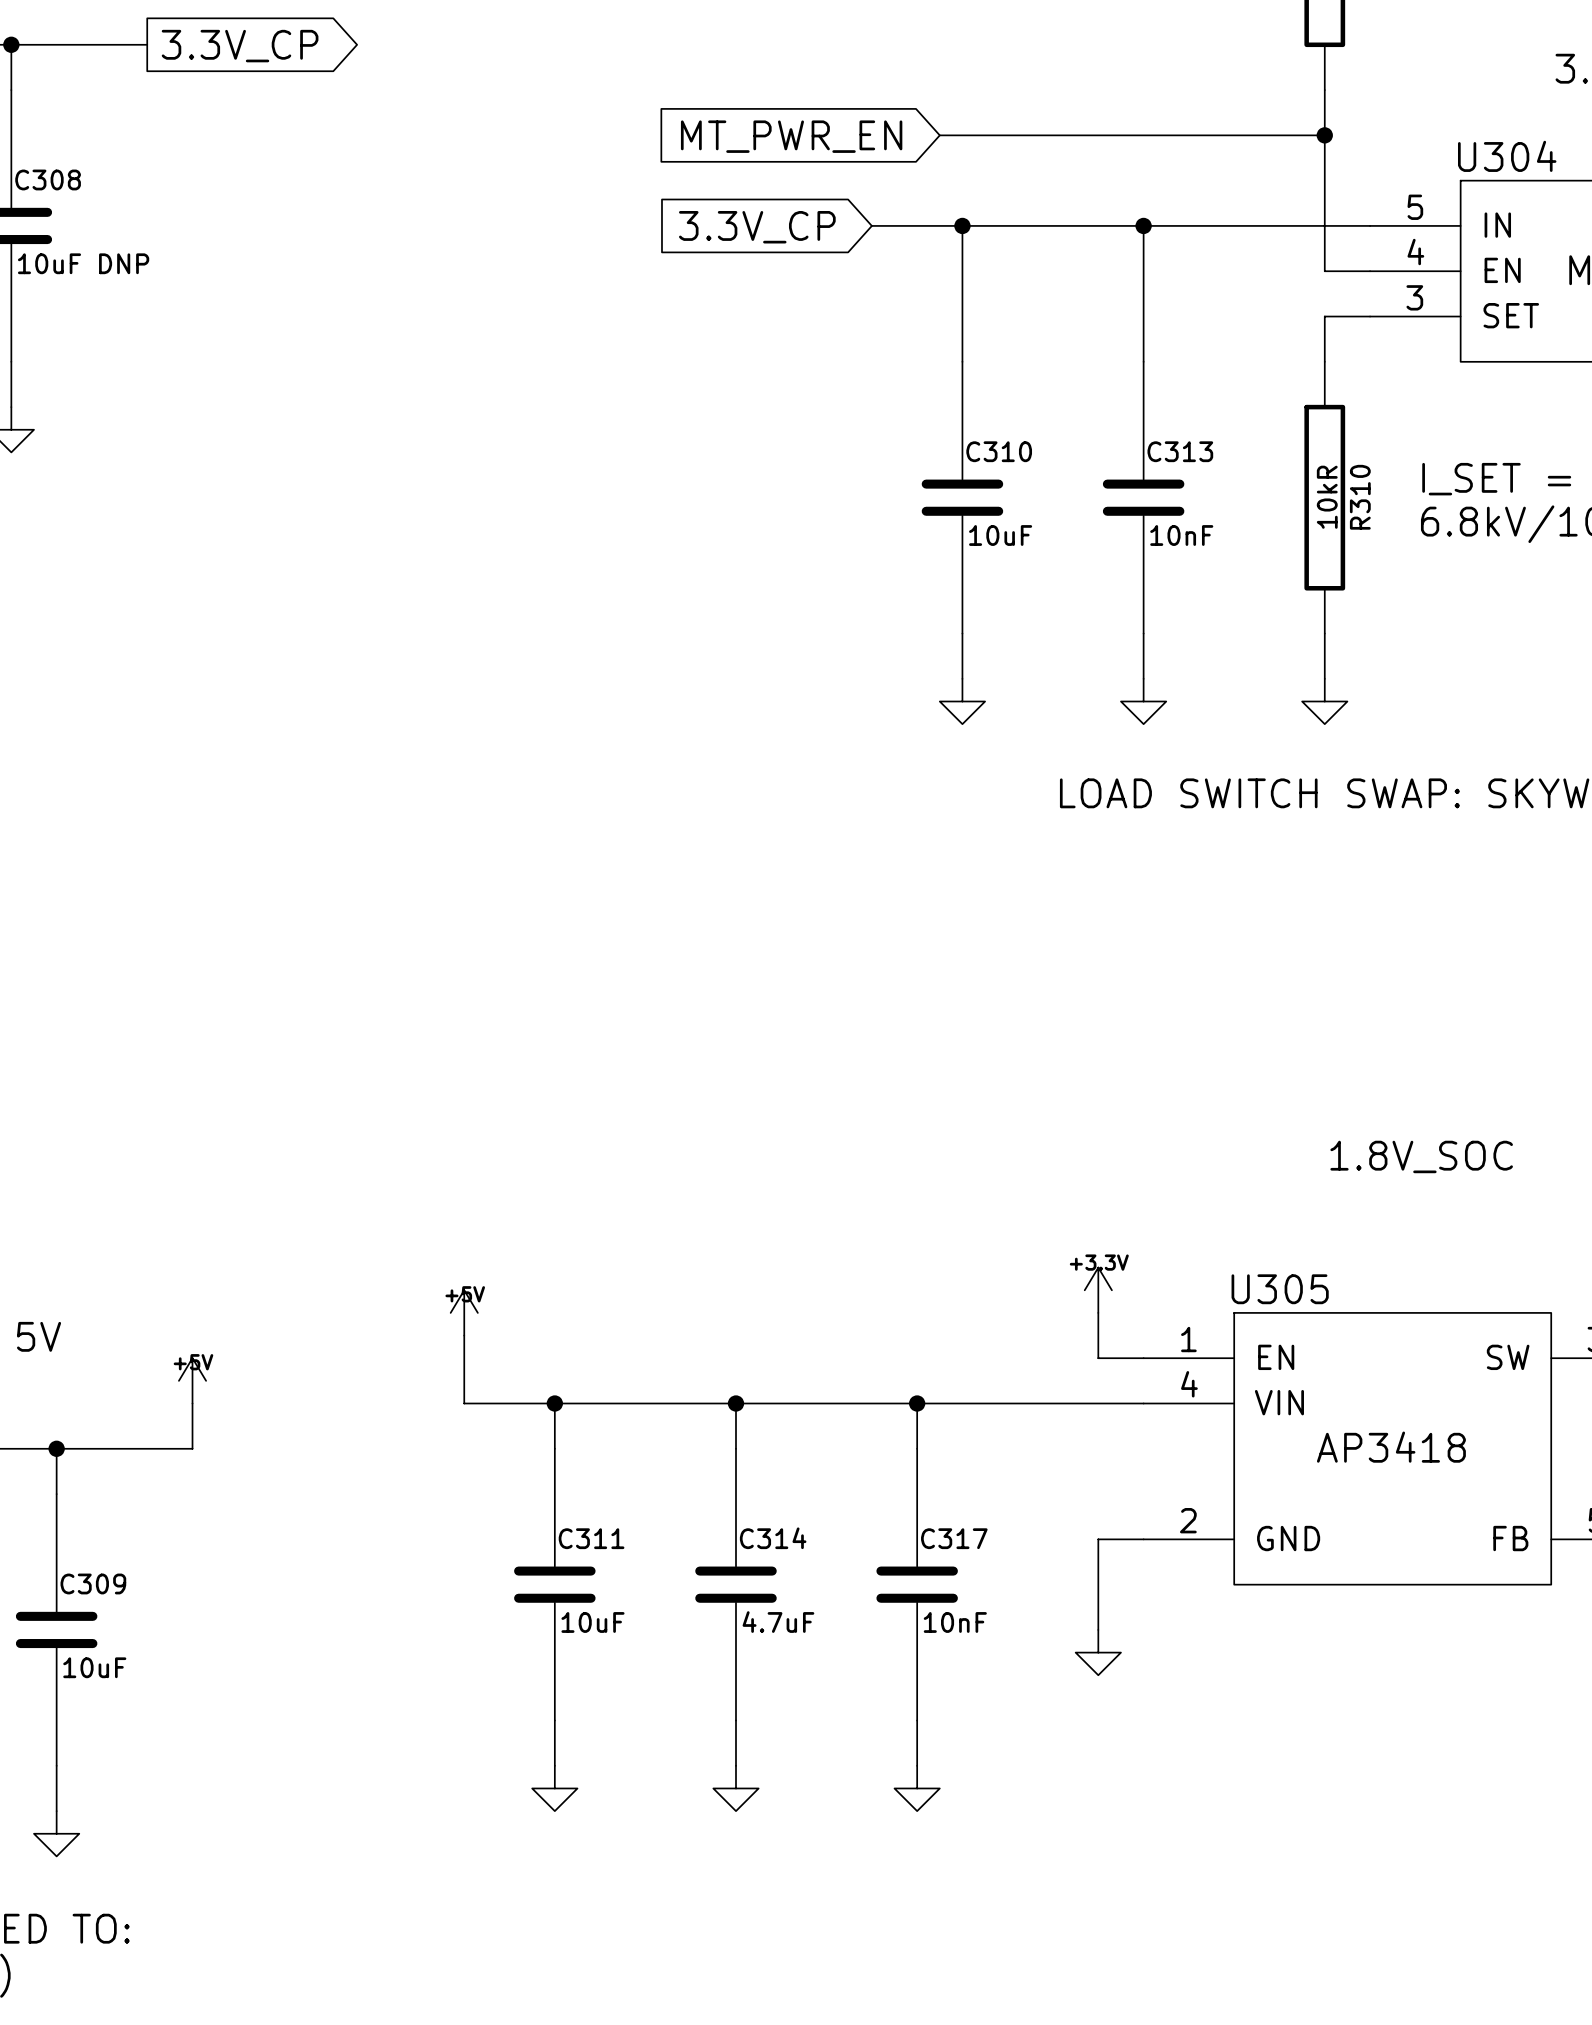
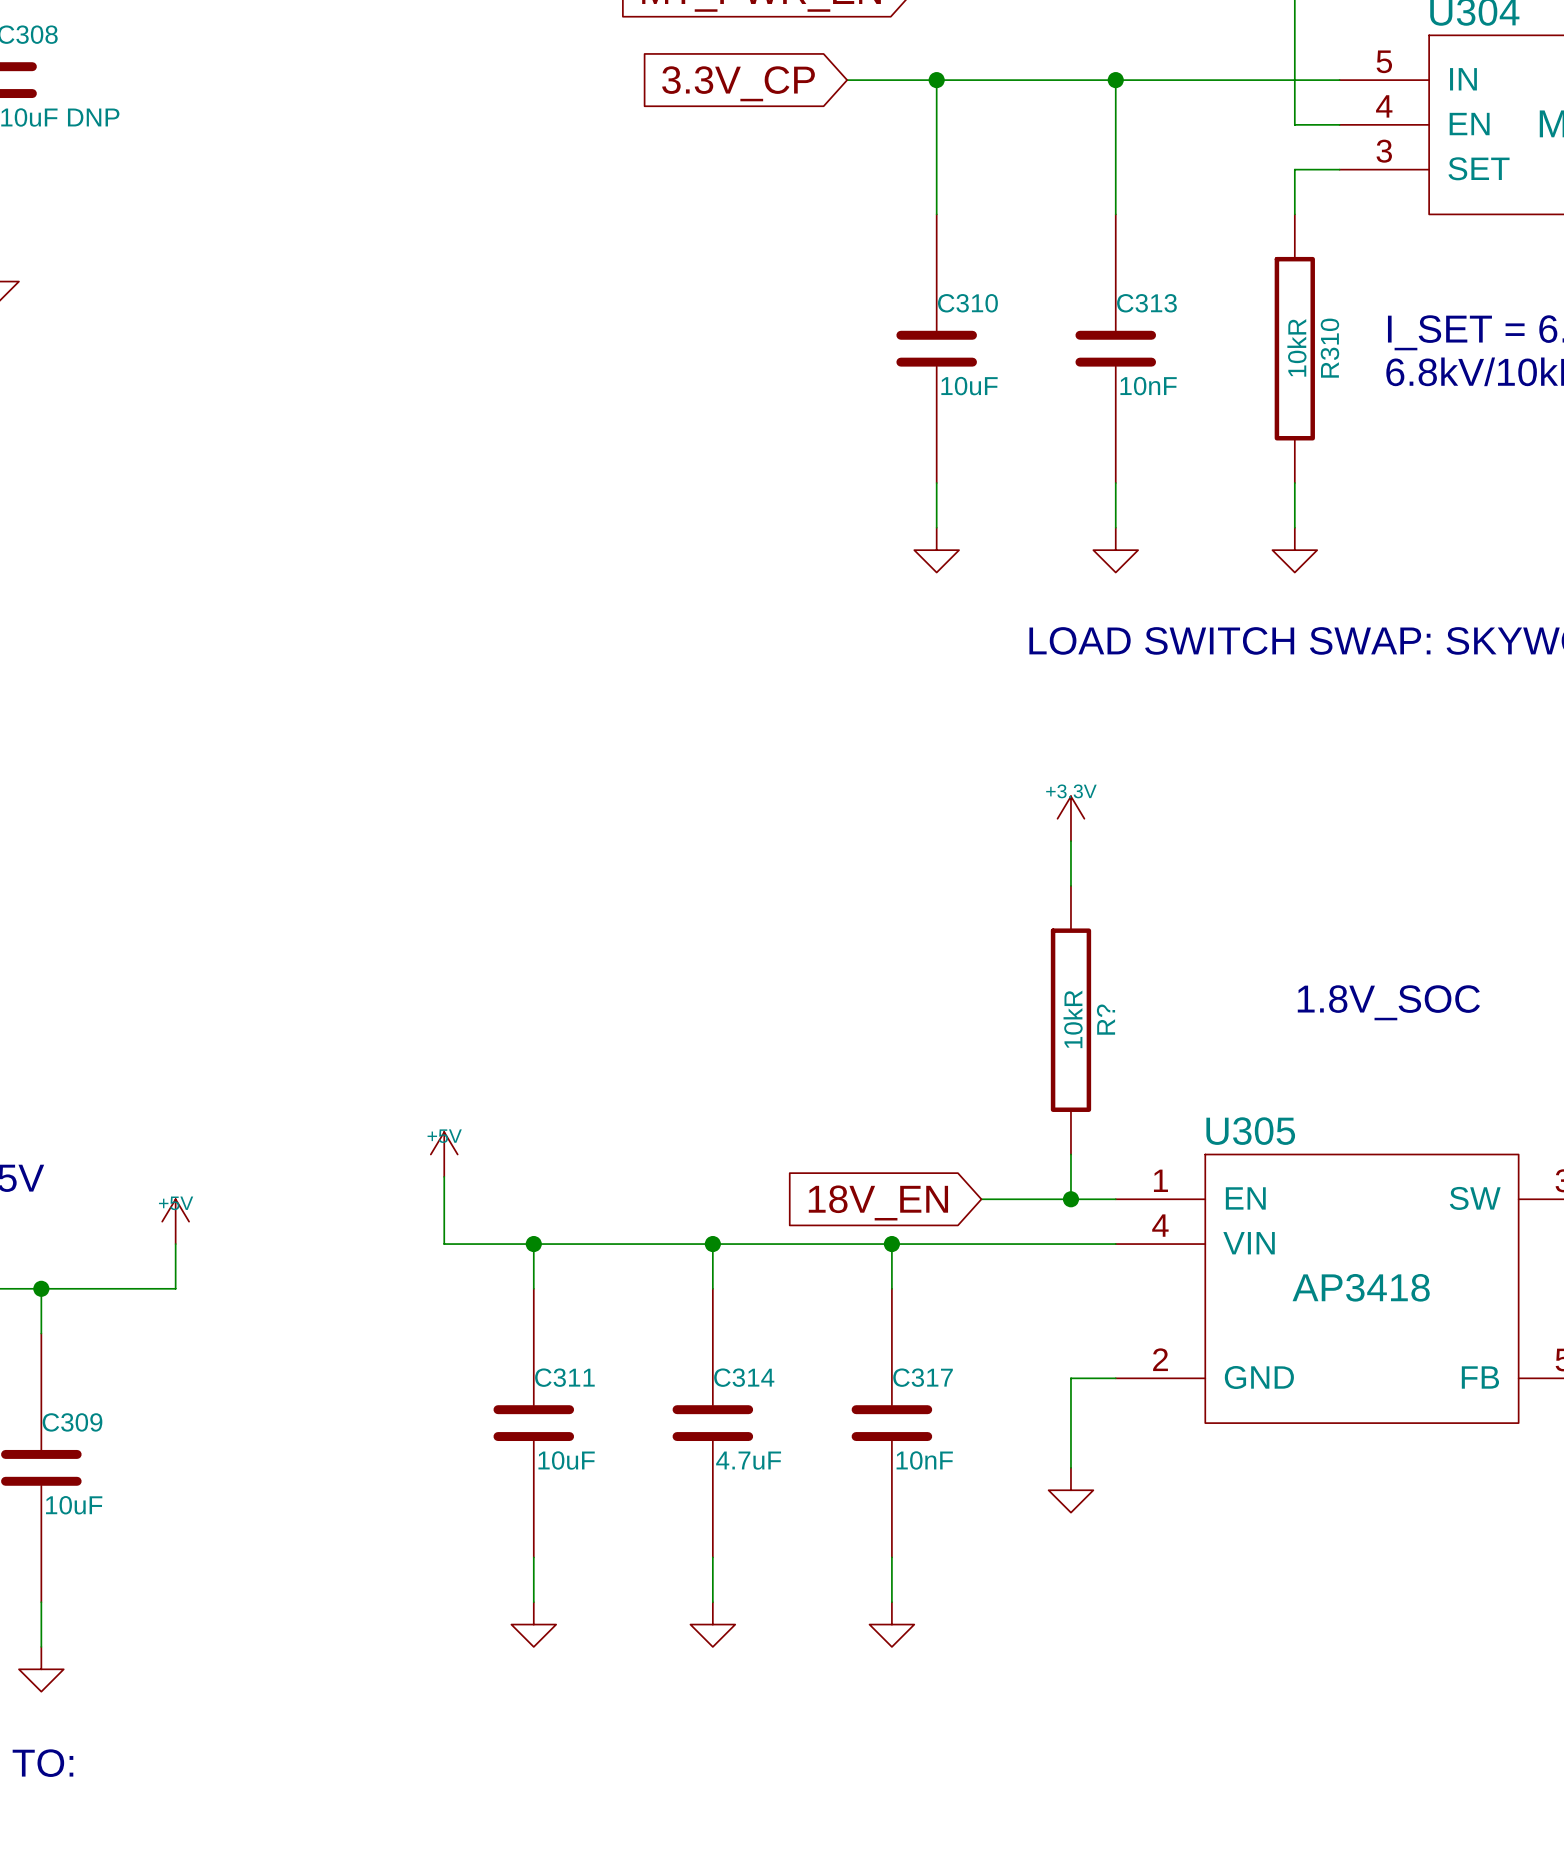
wire: none -> (1070, 841) (1070, 885)
R?: none -> 10kR (1070, 1020)
power symbol position: +3.3V (1098, 1290) -> +3.3V (1070, 818)
wire: none -> (981, 1199) (1070, 1199)
junction: none -> (1070, 1199)
global label: none -> 18V_EN (878, 1202)

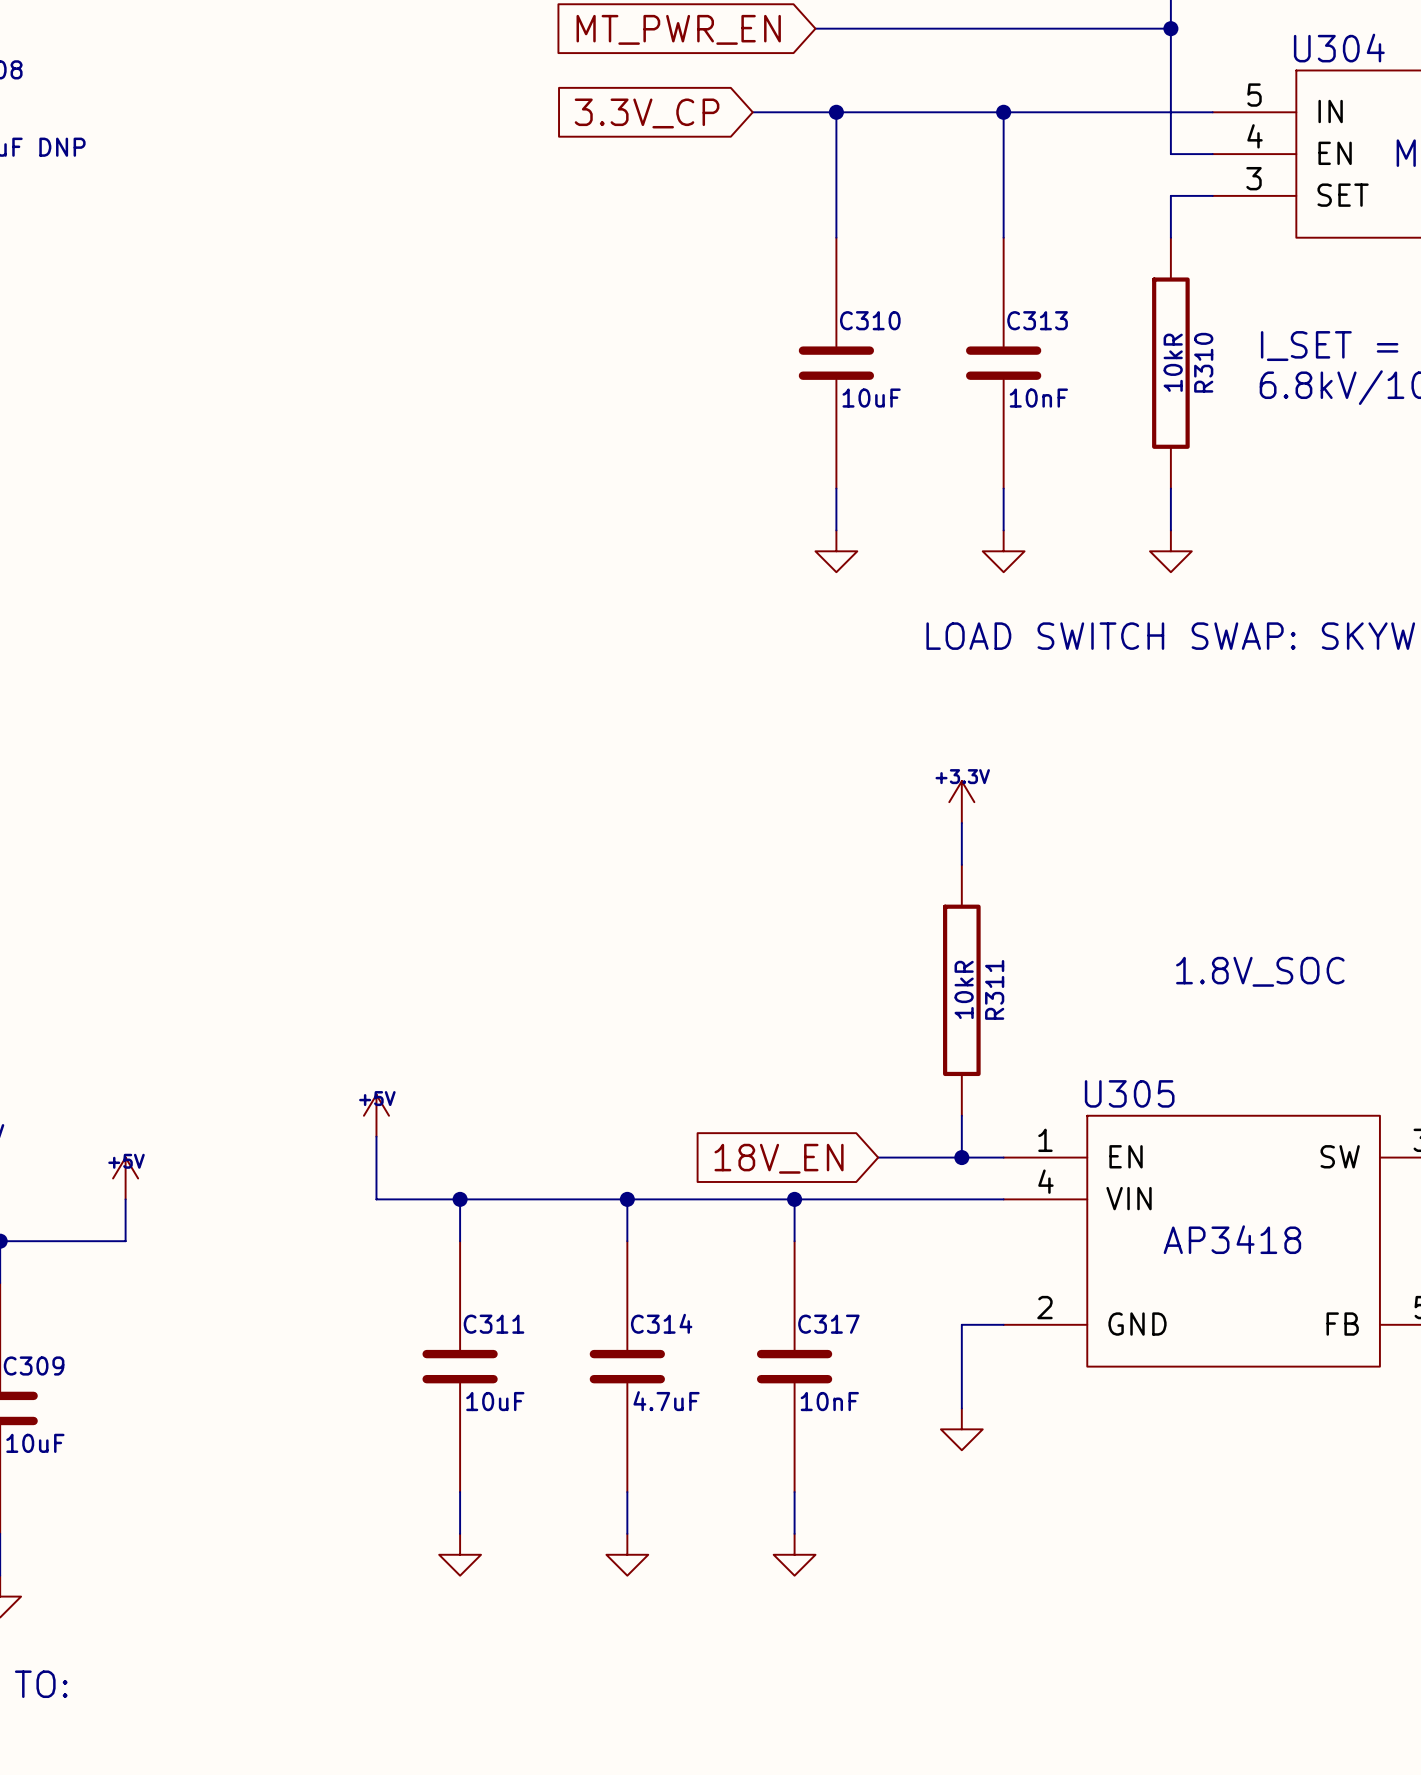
R? name: R? (1105, 1019) -> R311 (994, 989)

